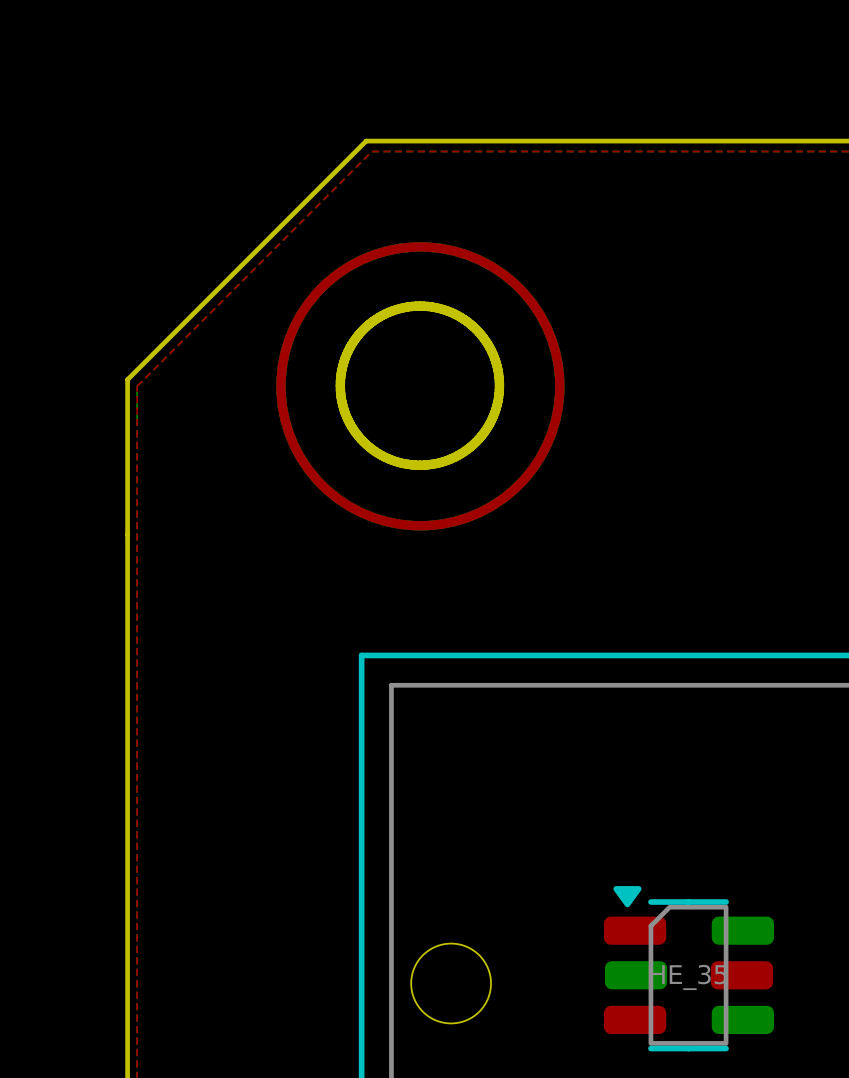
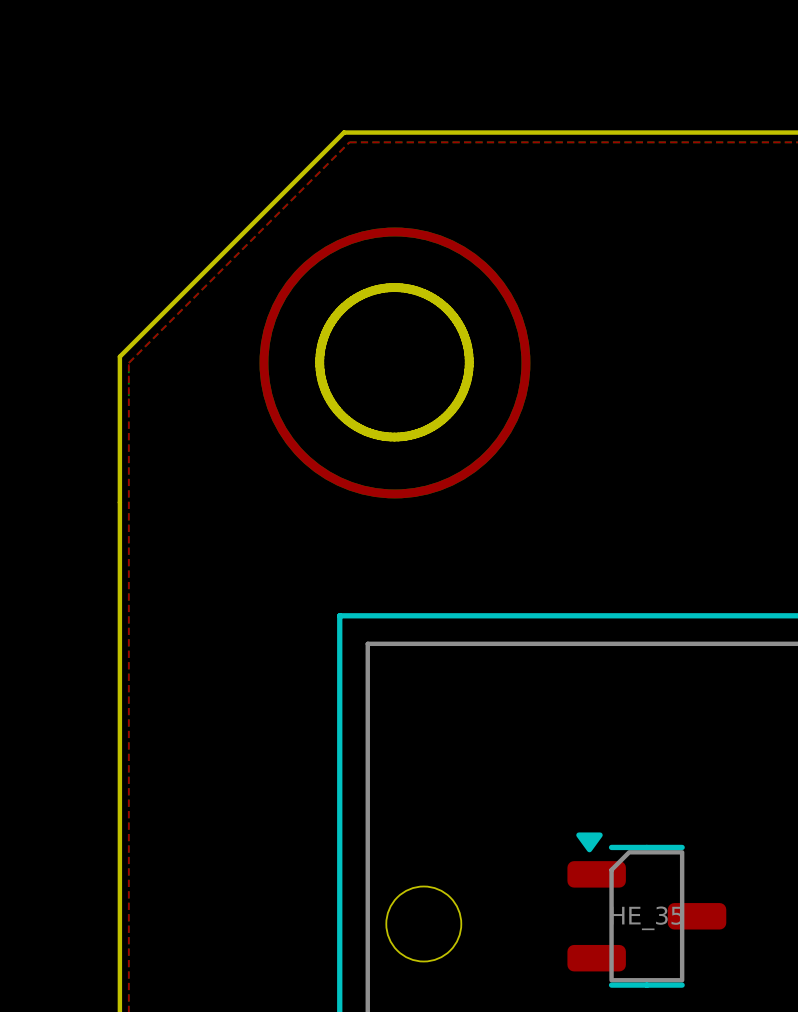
part: (689, 975) -> none

